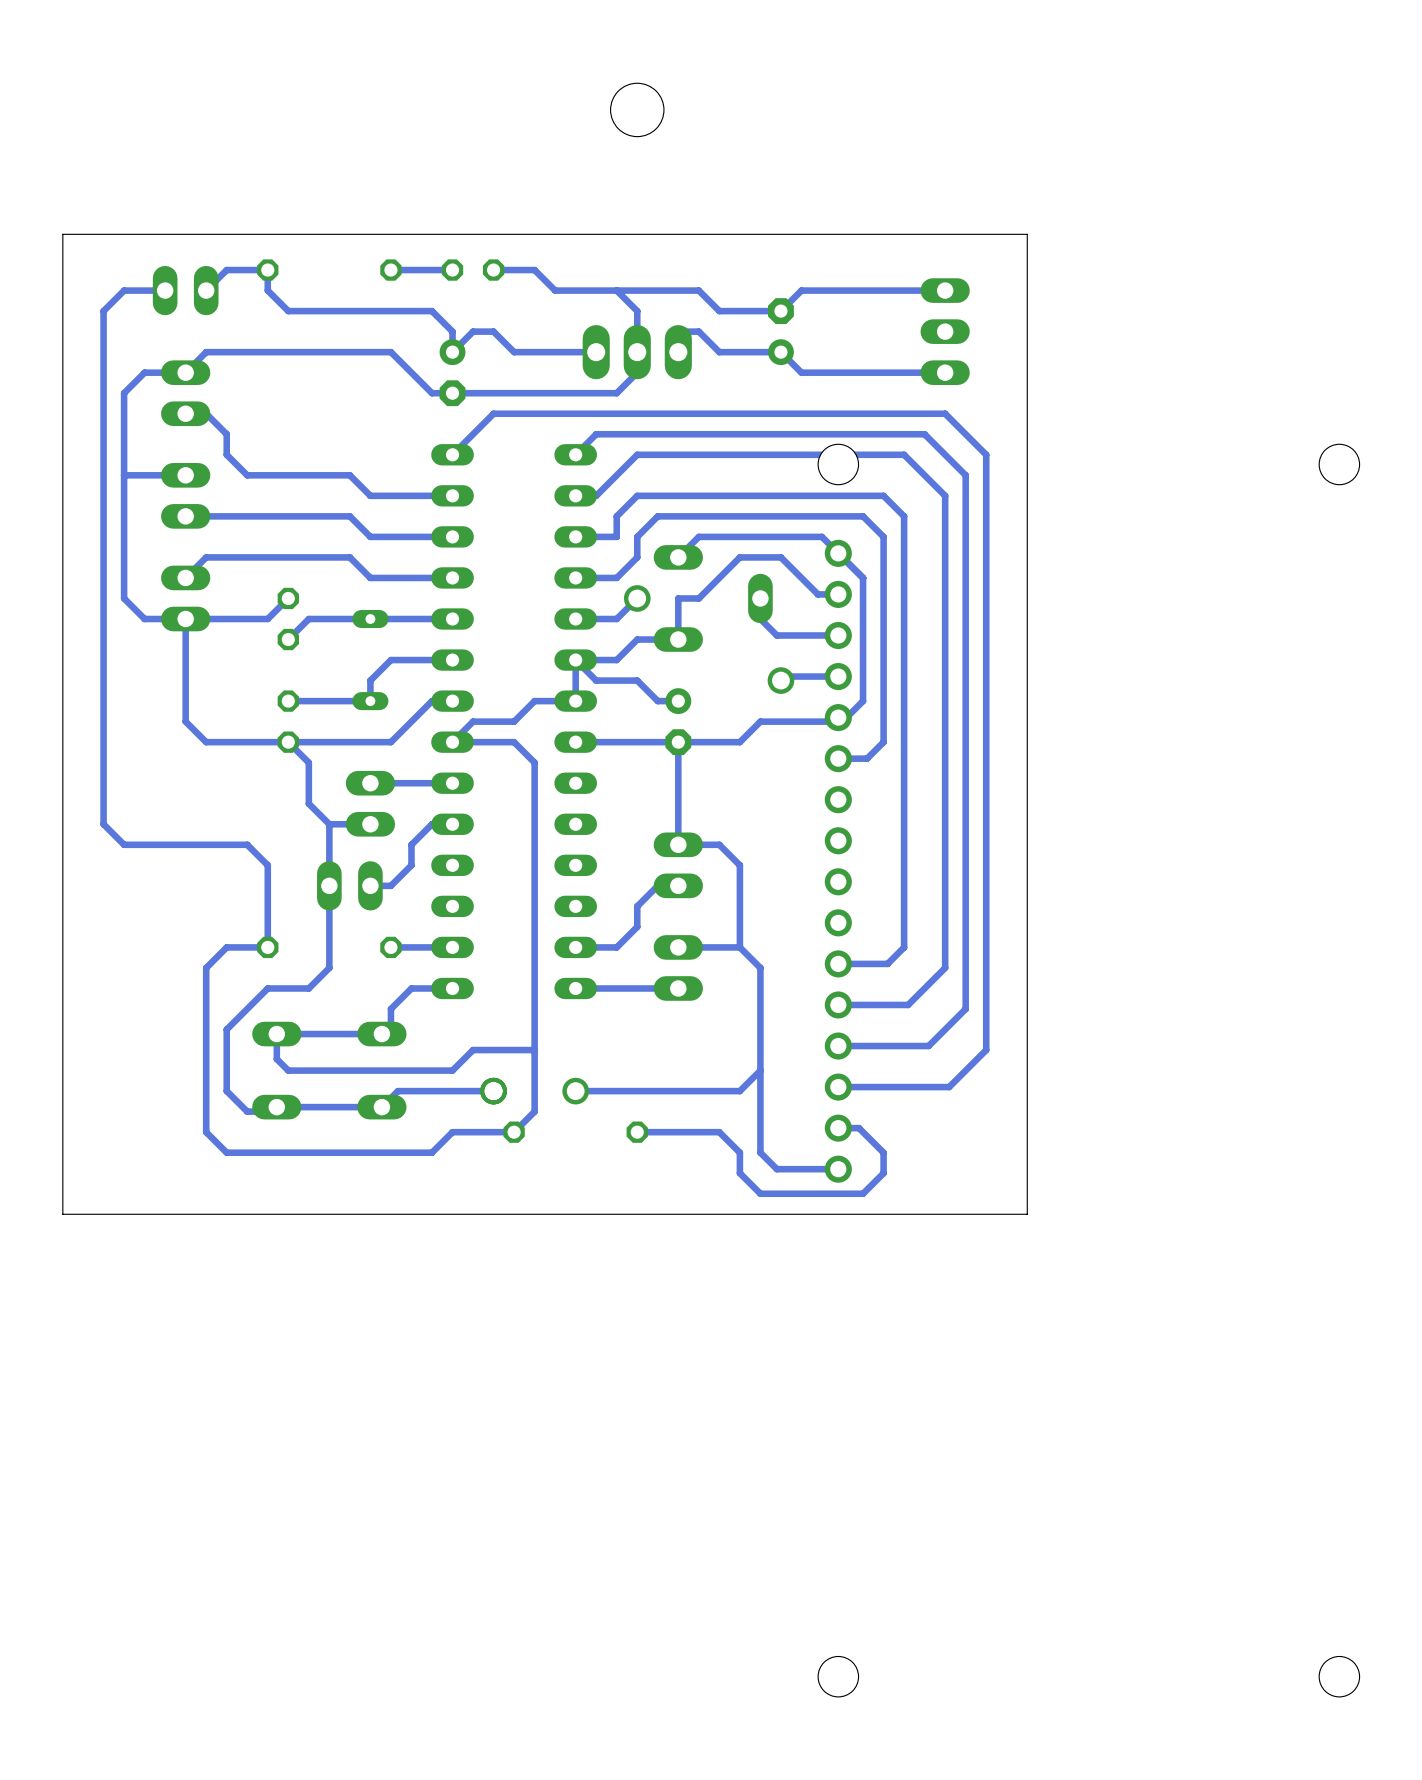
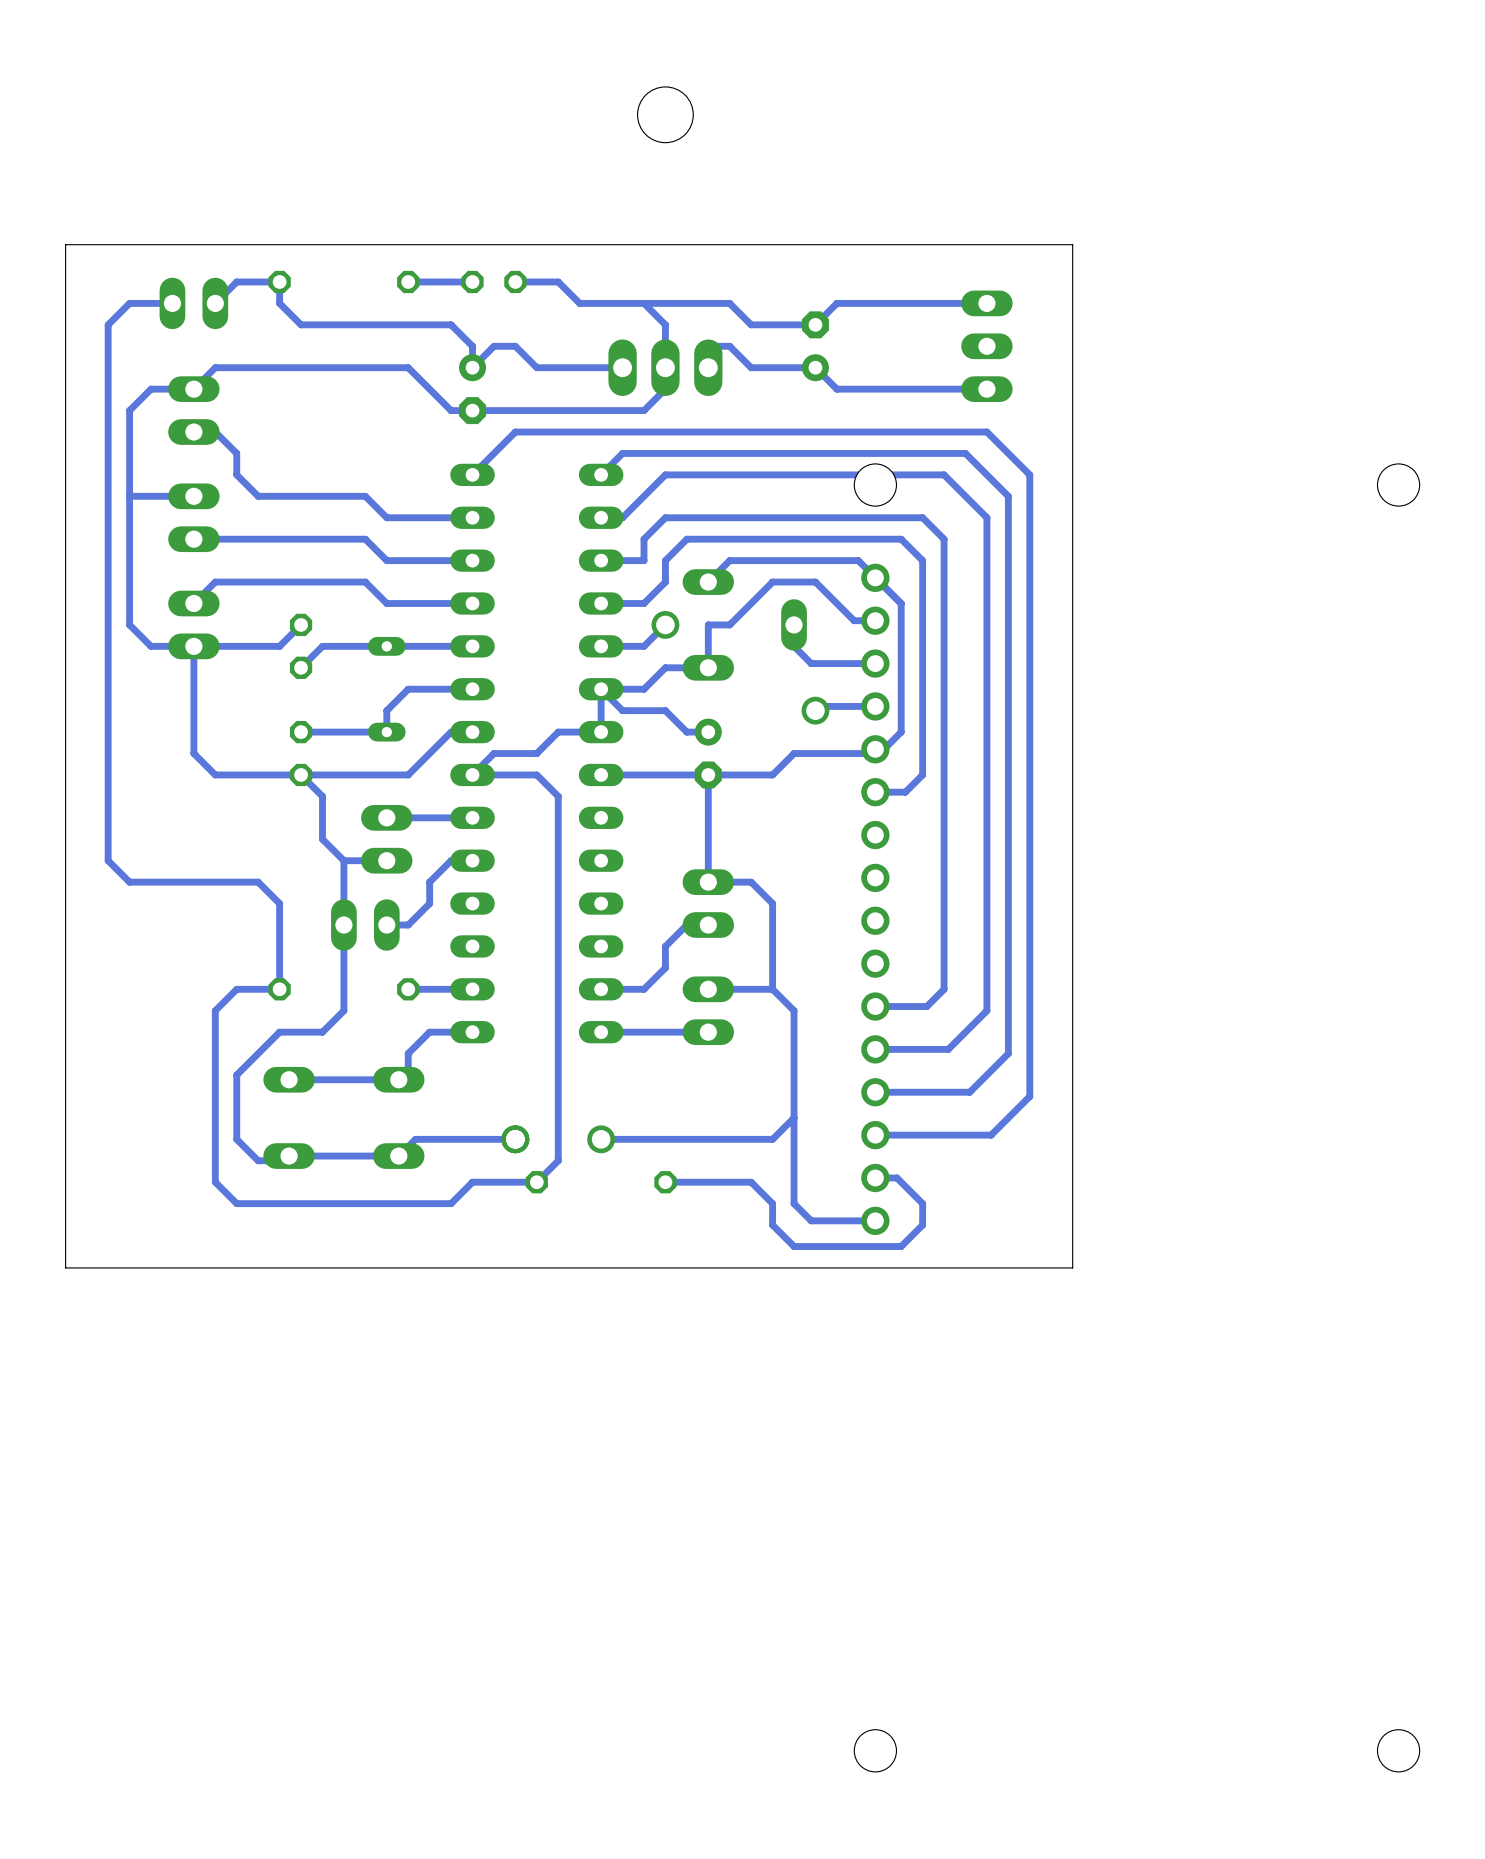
track: (276, 1034) (276, 1059) (288, 1070) (452, 1070) (473, 1050) (534, 1050) -> none

